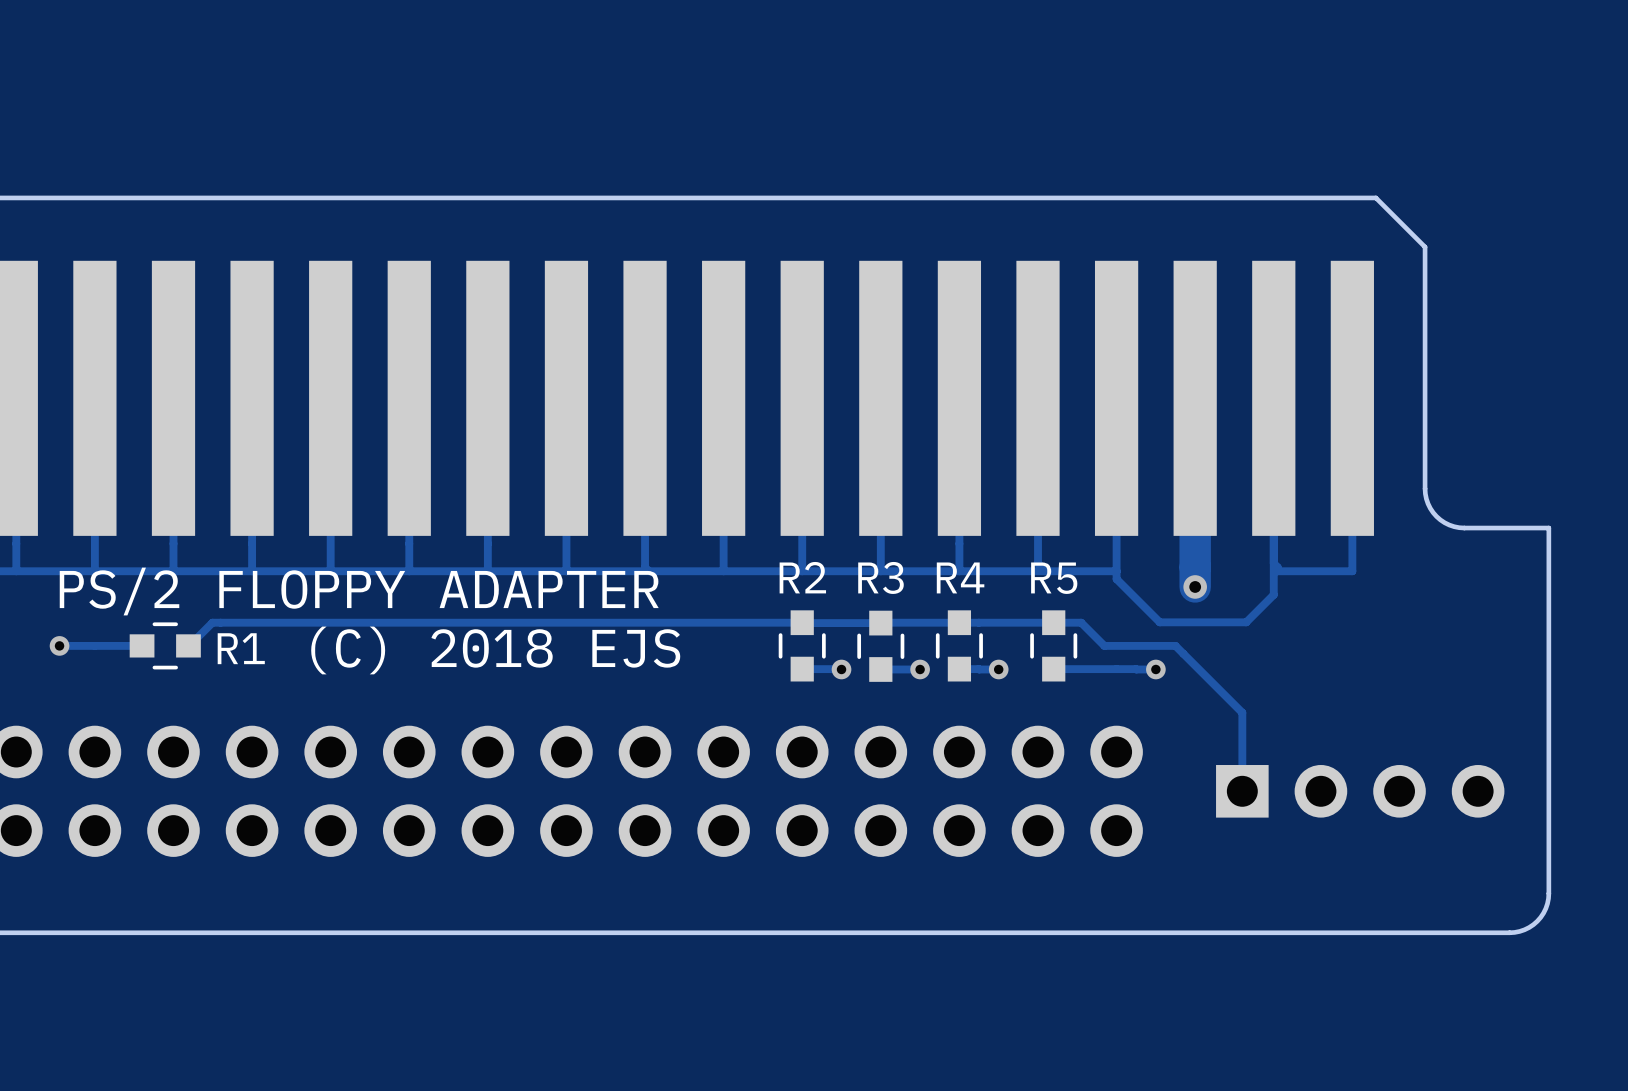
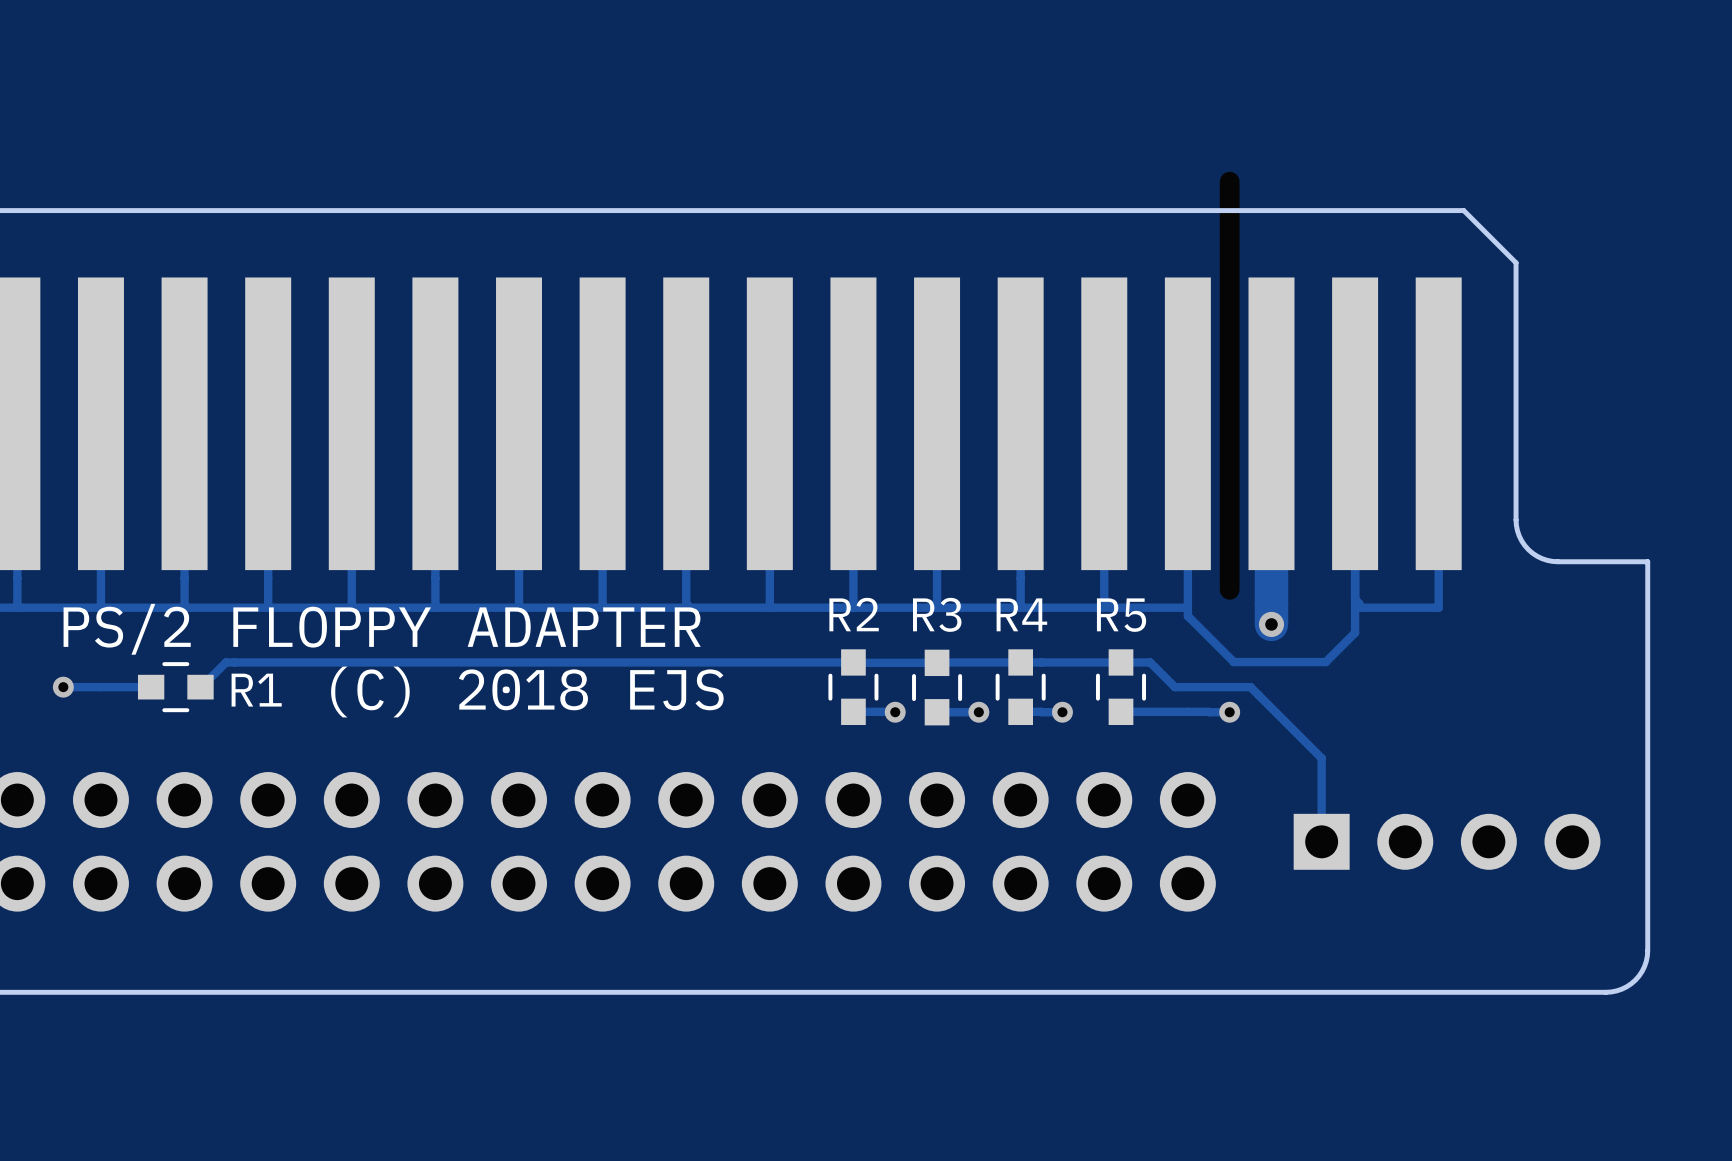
part: none -> (1229, 385)

